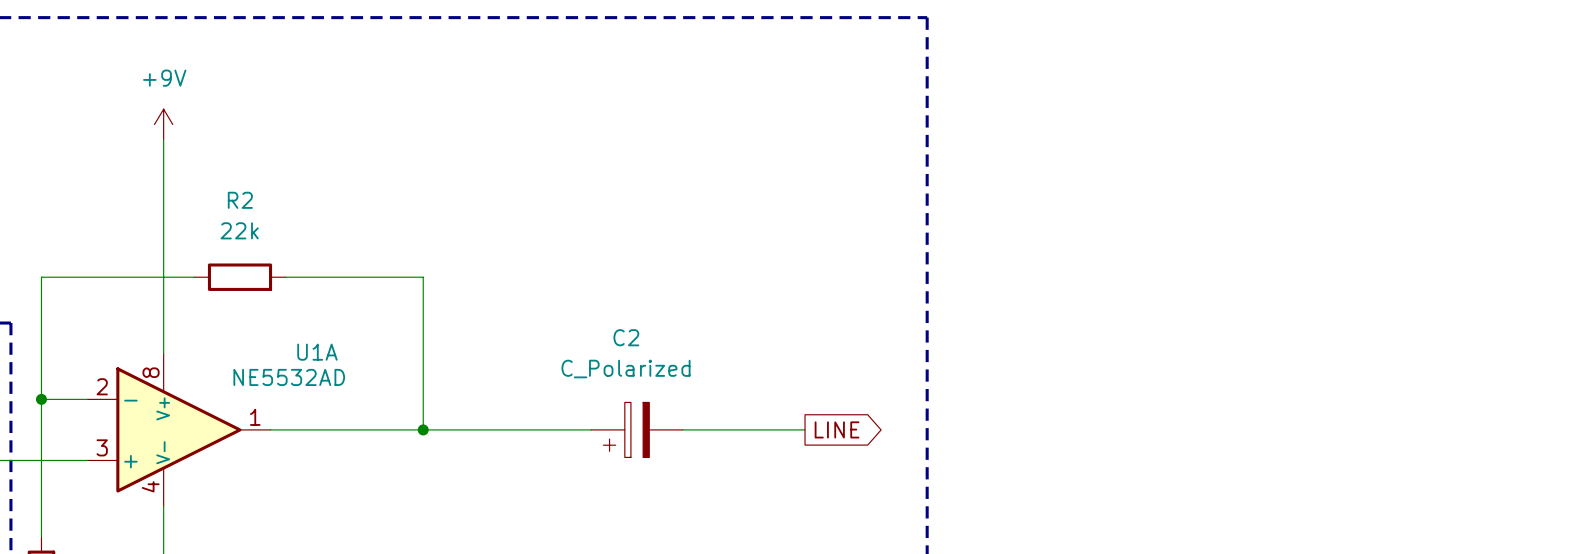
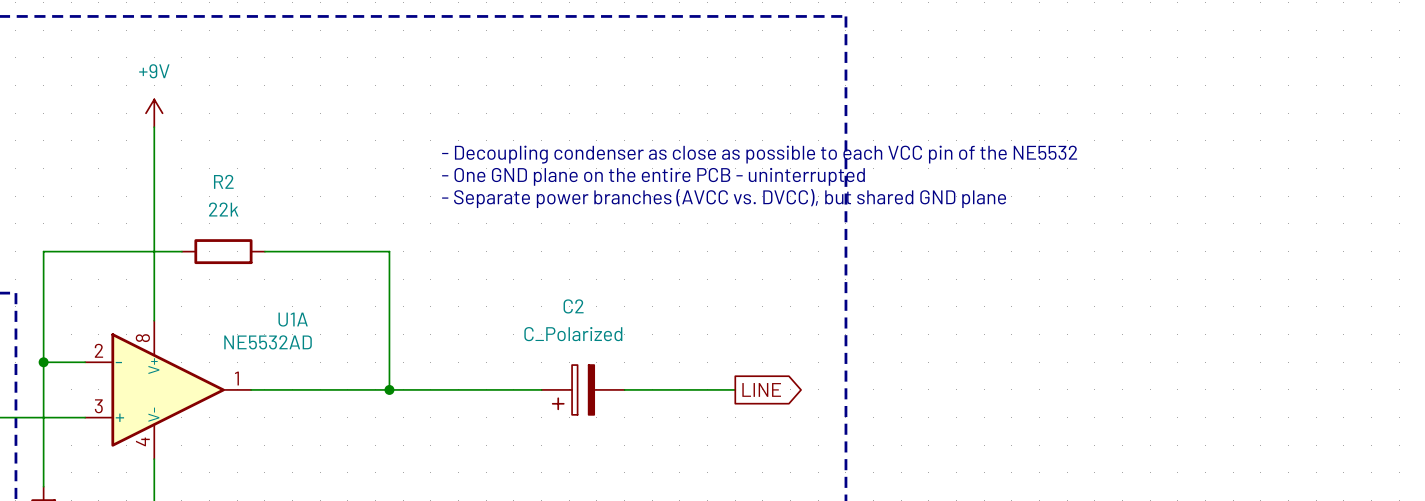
text: none -> - Decoupling condenser as close as possible to each VCC pin of the NE5532 (759, 154)
text: none -> - One GND plane on the entire PCB - uninterrupted (653, 176)
text: none -> - Separate power branches (AVCC vs. DVCC), but shared GND plane (724, 198)

